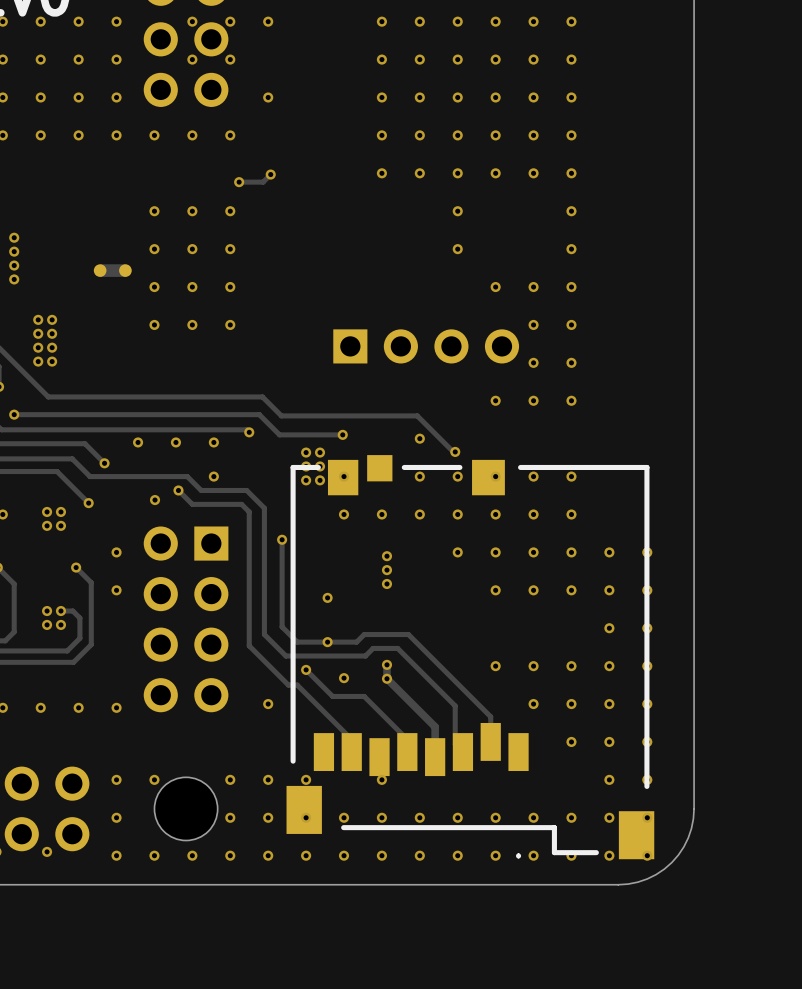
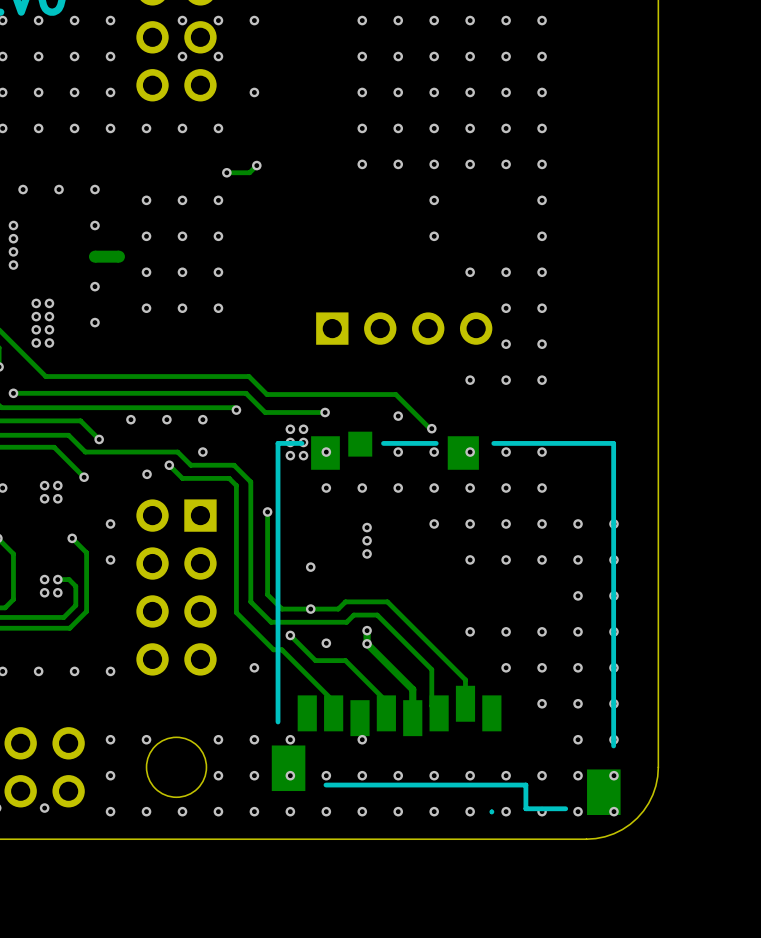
via: none -> (23, 189)
via: none -> (59, 189)
via: none -> (94, 189)
via: none -> (94, 225)
via: none -> (94, 286)
via: none -> (94, 322)

